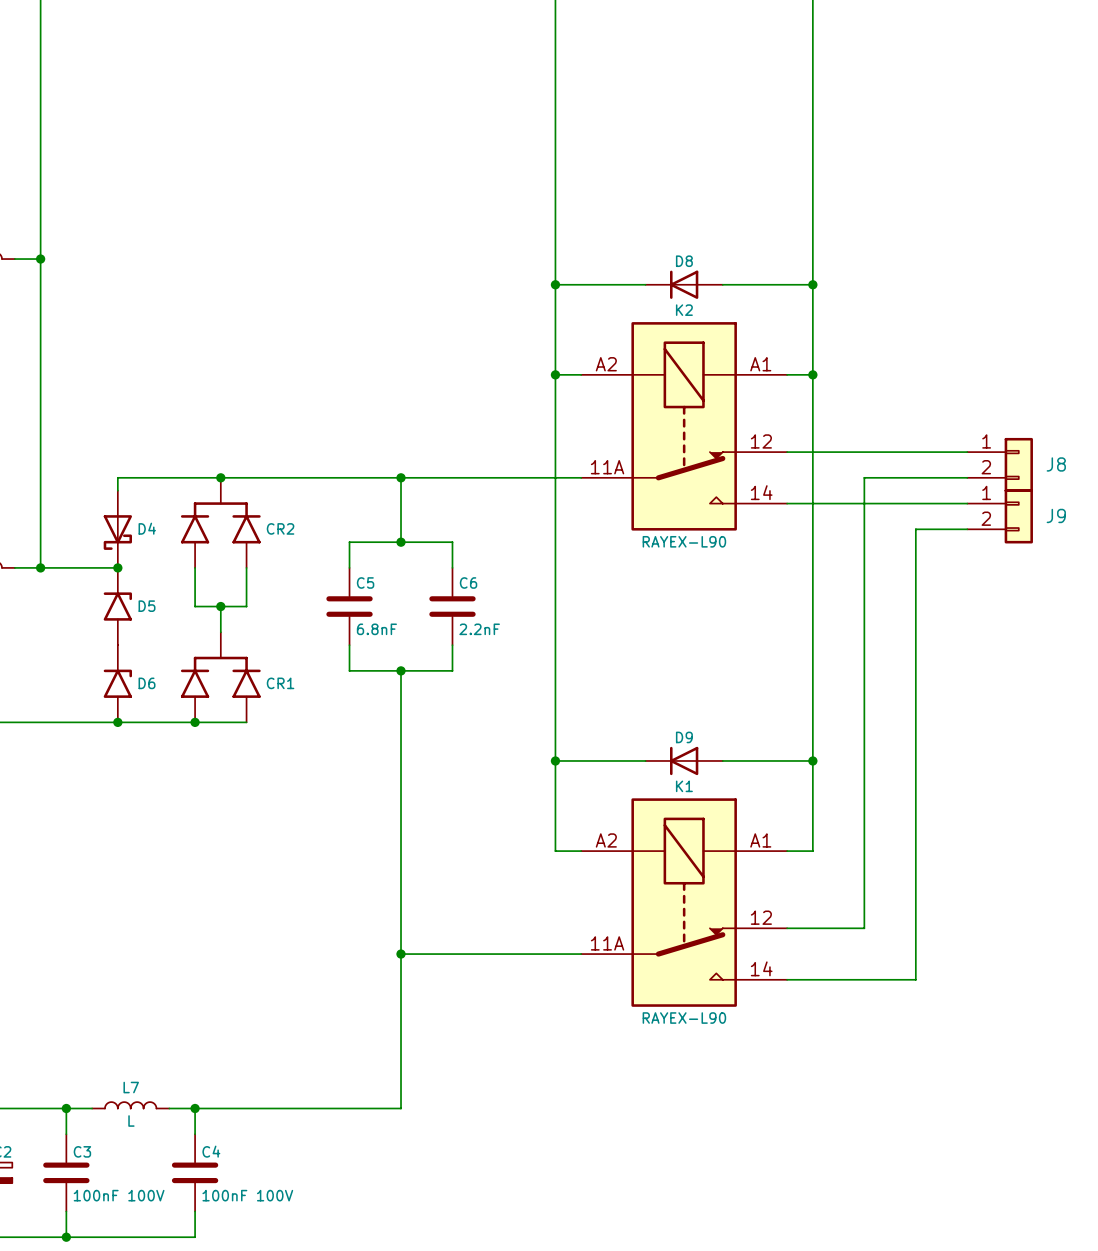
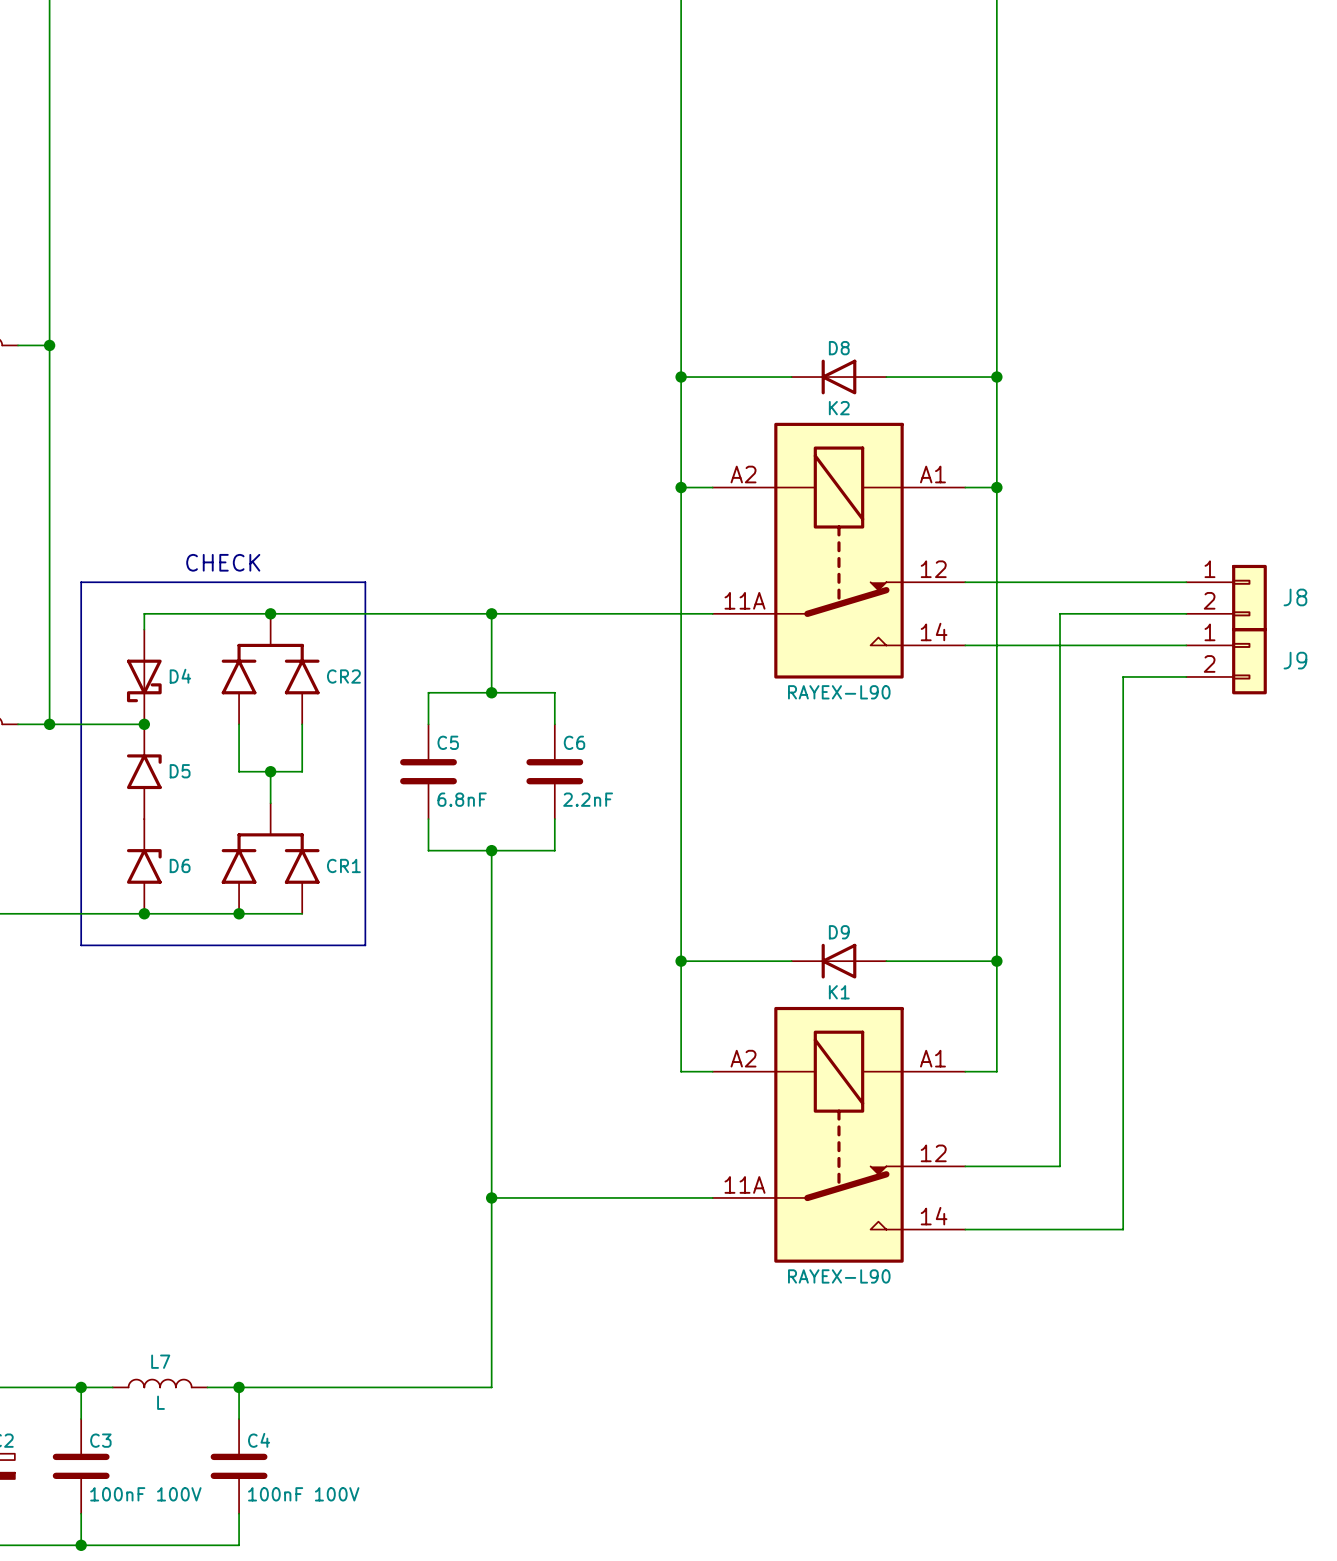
text: none -> CHECK (223, 562)
line: none -> (81, 582) (365, 582) (365, 945) (81, 945) (81, 582)

